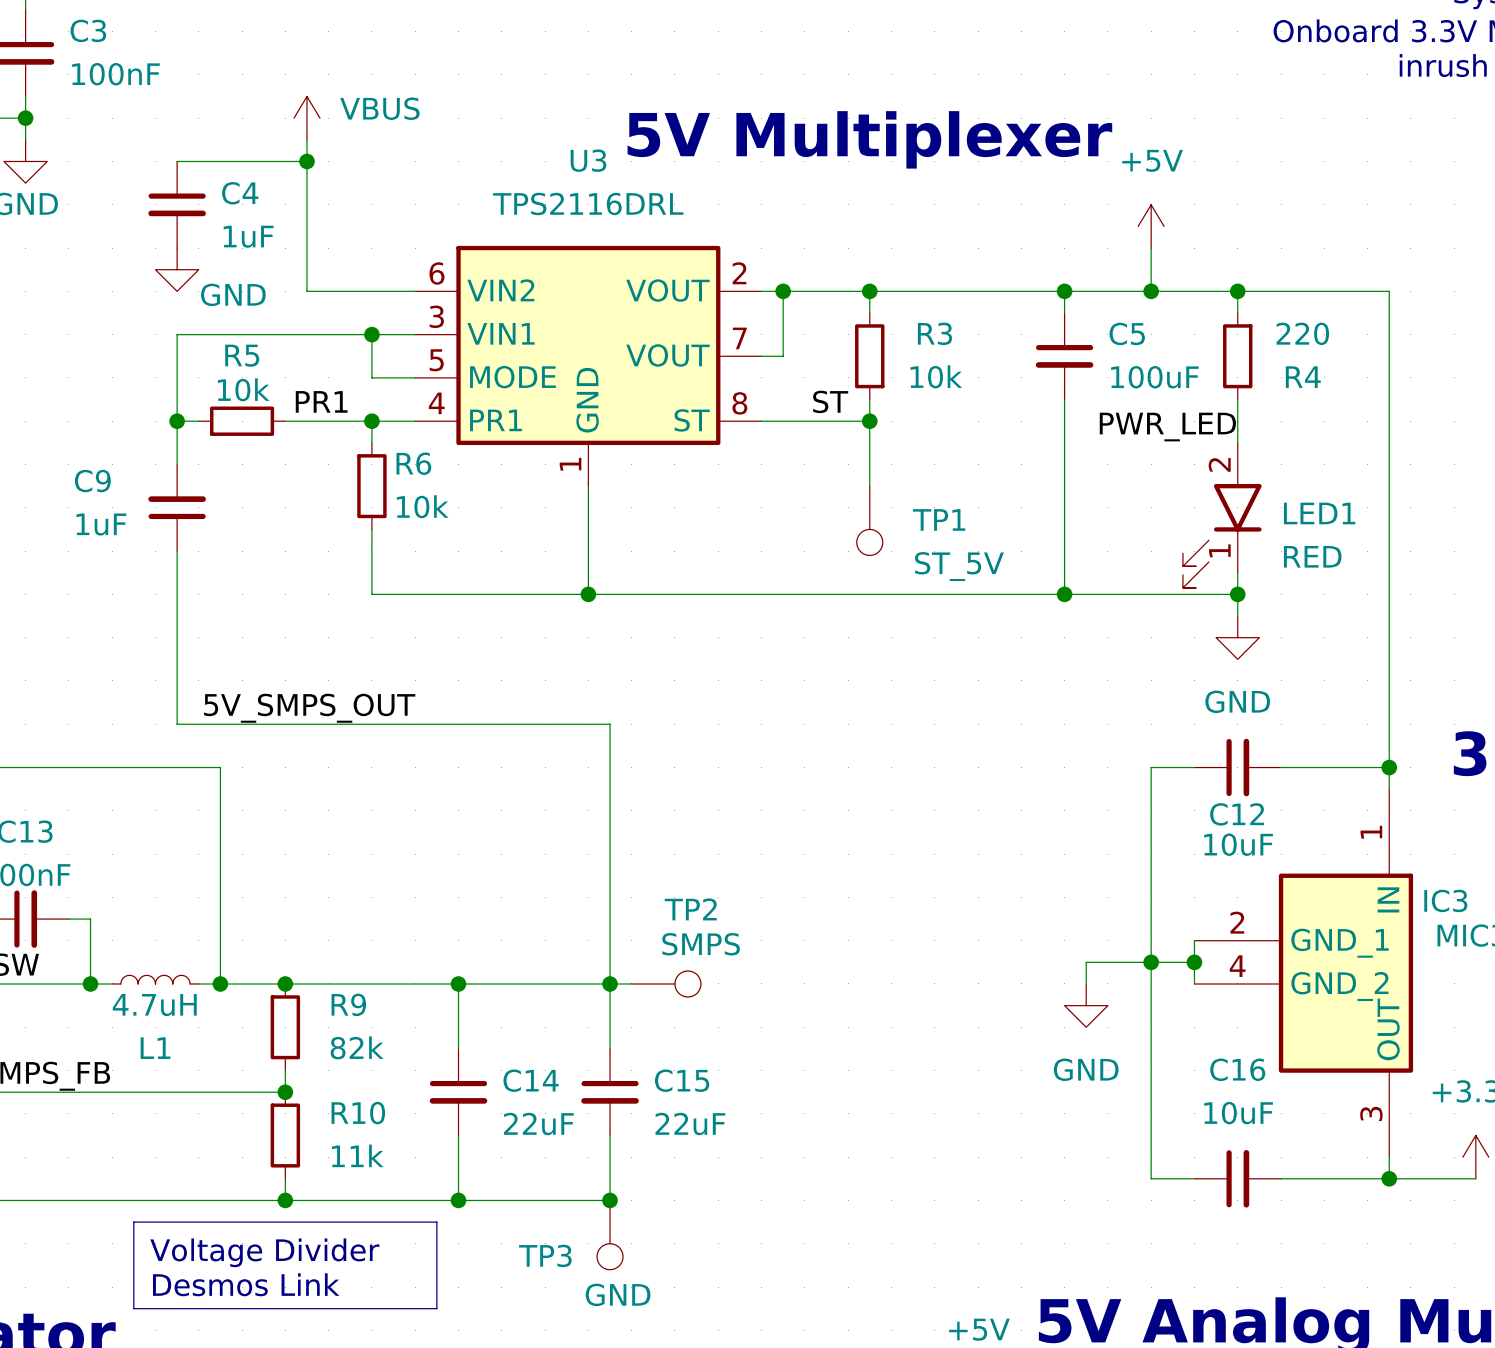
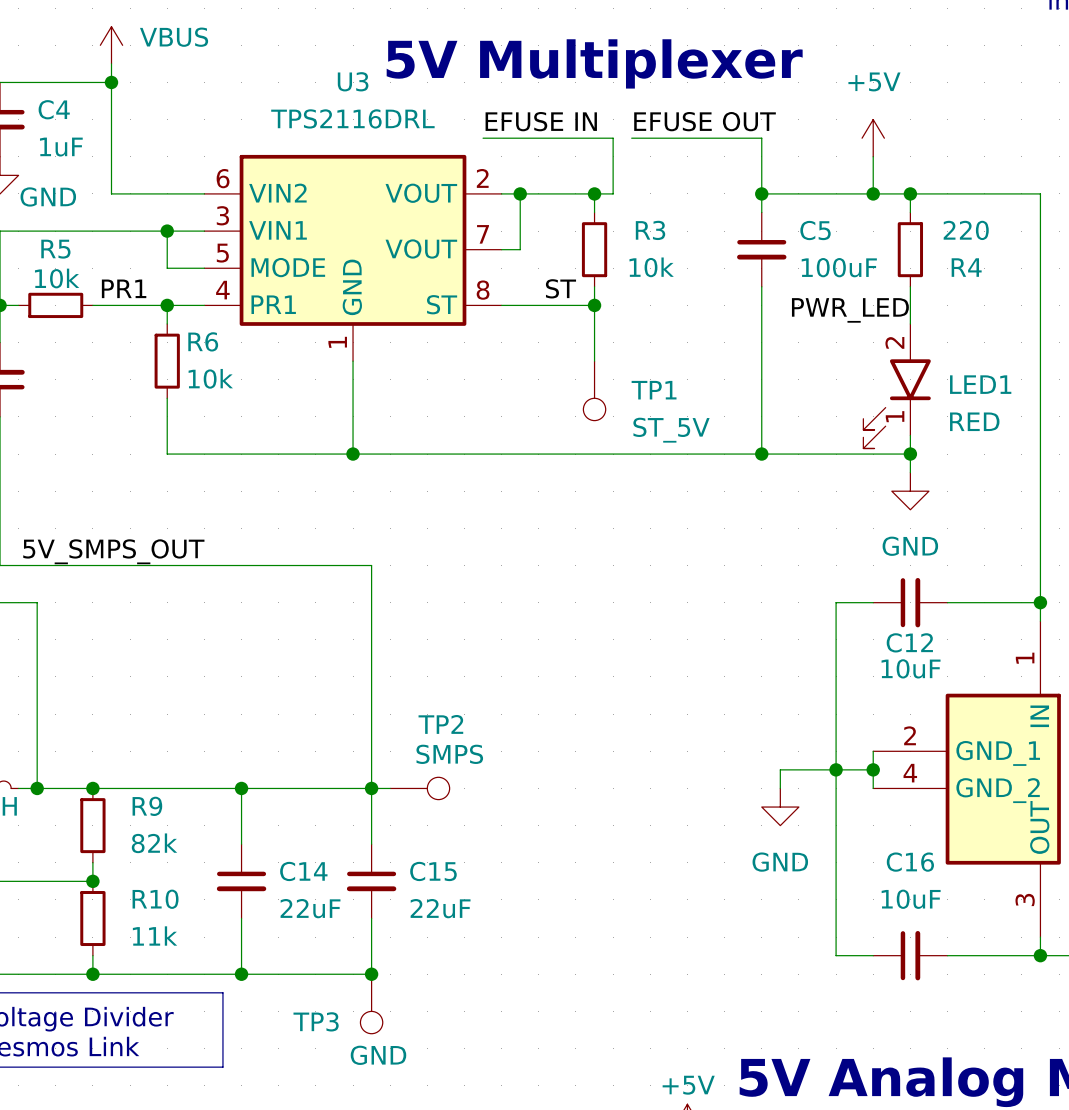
label: none -> EFUSE IN (541, 121)
label: none -> EFUSE OUT (705, 121)
wire: none -> (483, 138) (613, 138) (613, 193)
power symbol position: +5V (1151, 226) -> +5V (873, 138)
wire: (1151, 248) (1151, 291) -> (873, 156) (873, 193)
wire: (891, 291) (1064, 291) -> (631, 138) (761, 138) (761, 193)
junction position: (1151, 291) -> (873, 193)

